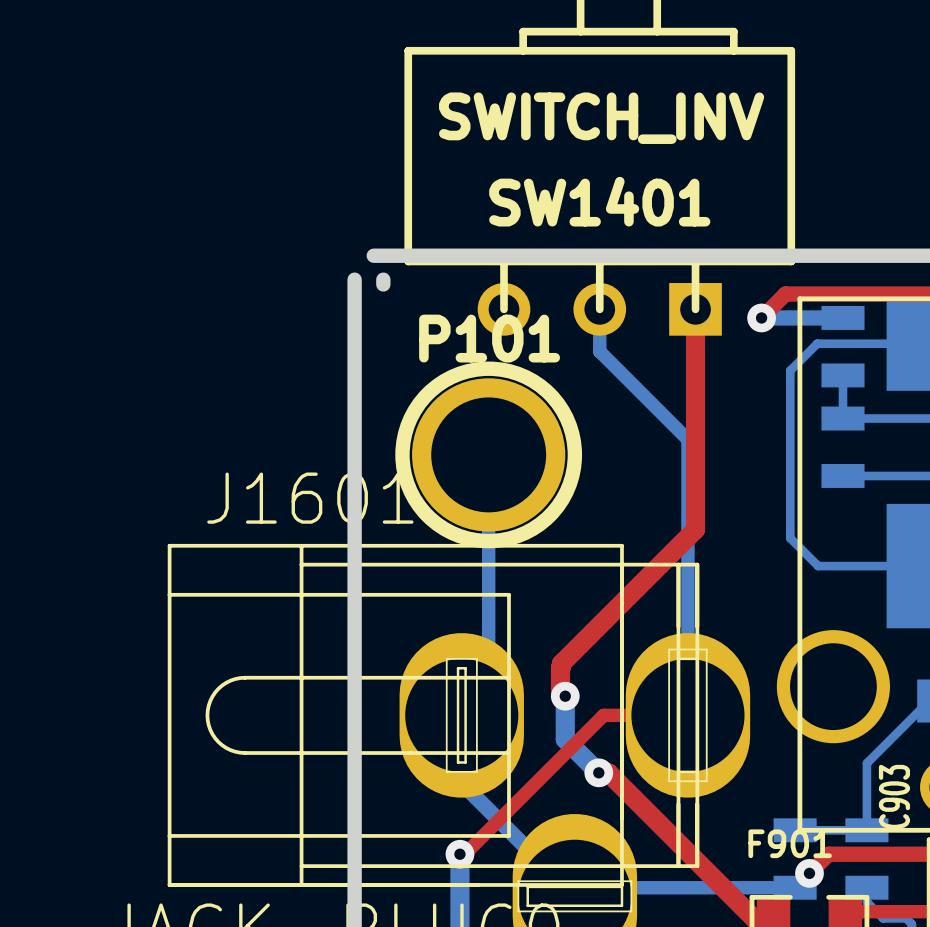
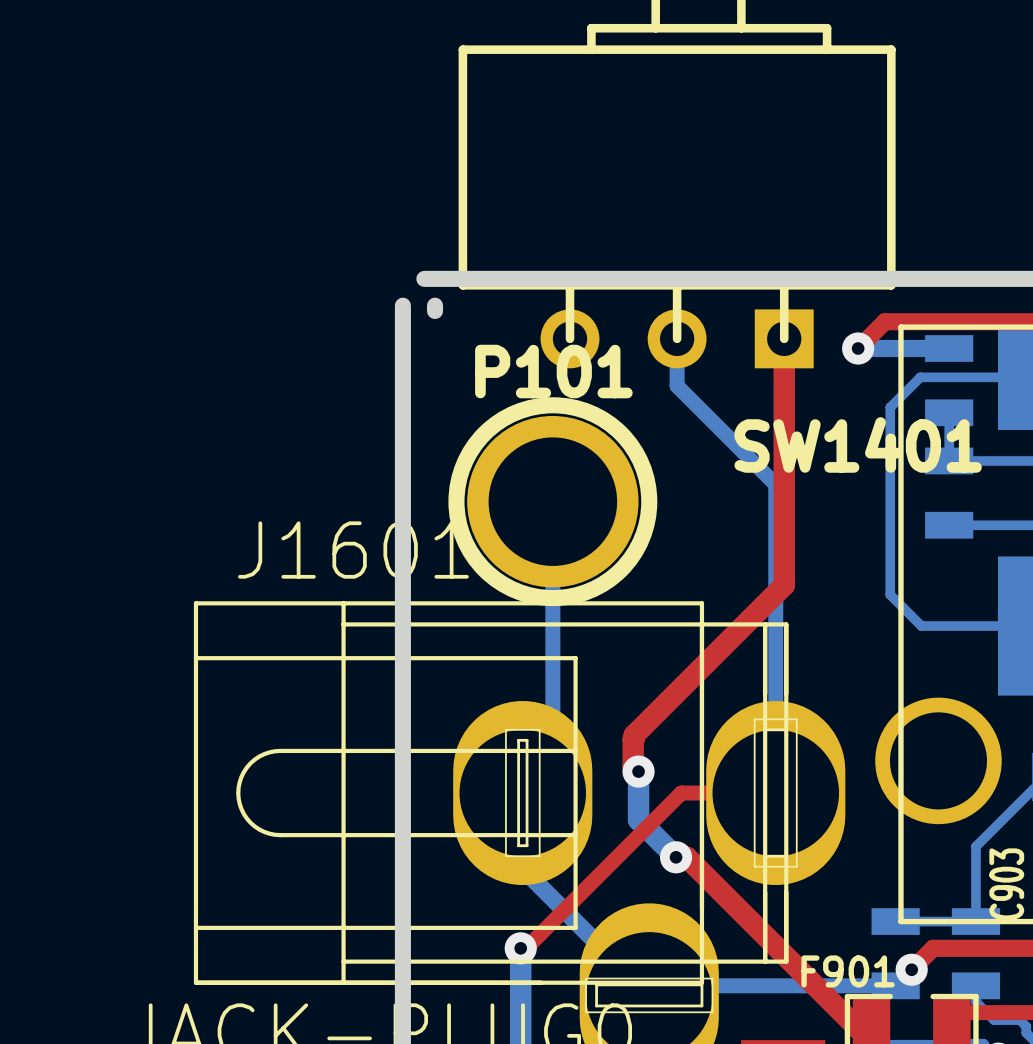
SW1401 value: SWITCH_INV (601, 118) -> none
SW1401 name position: SW1401 (599, 201) -> SW1401 (858, 444)
F901 name position: F901 (790, 843) -> F901 (848, 971)

